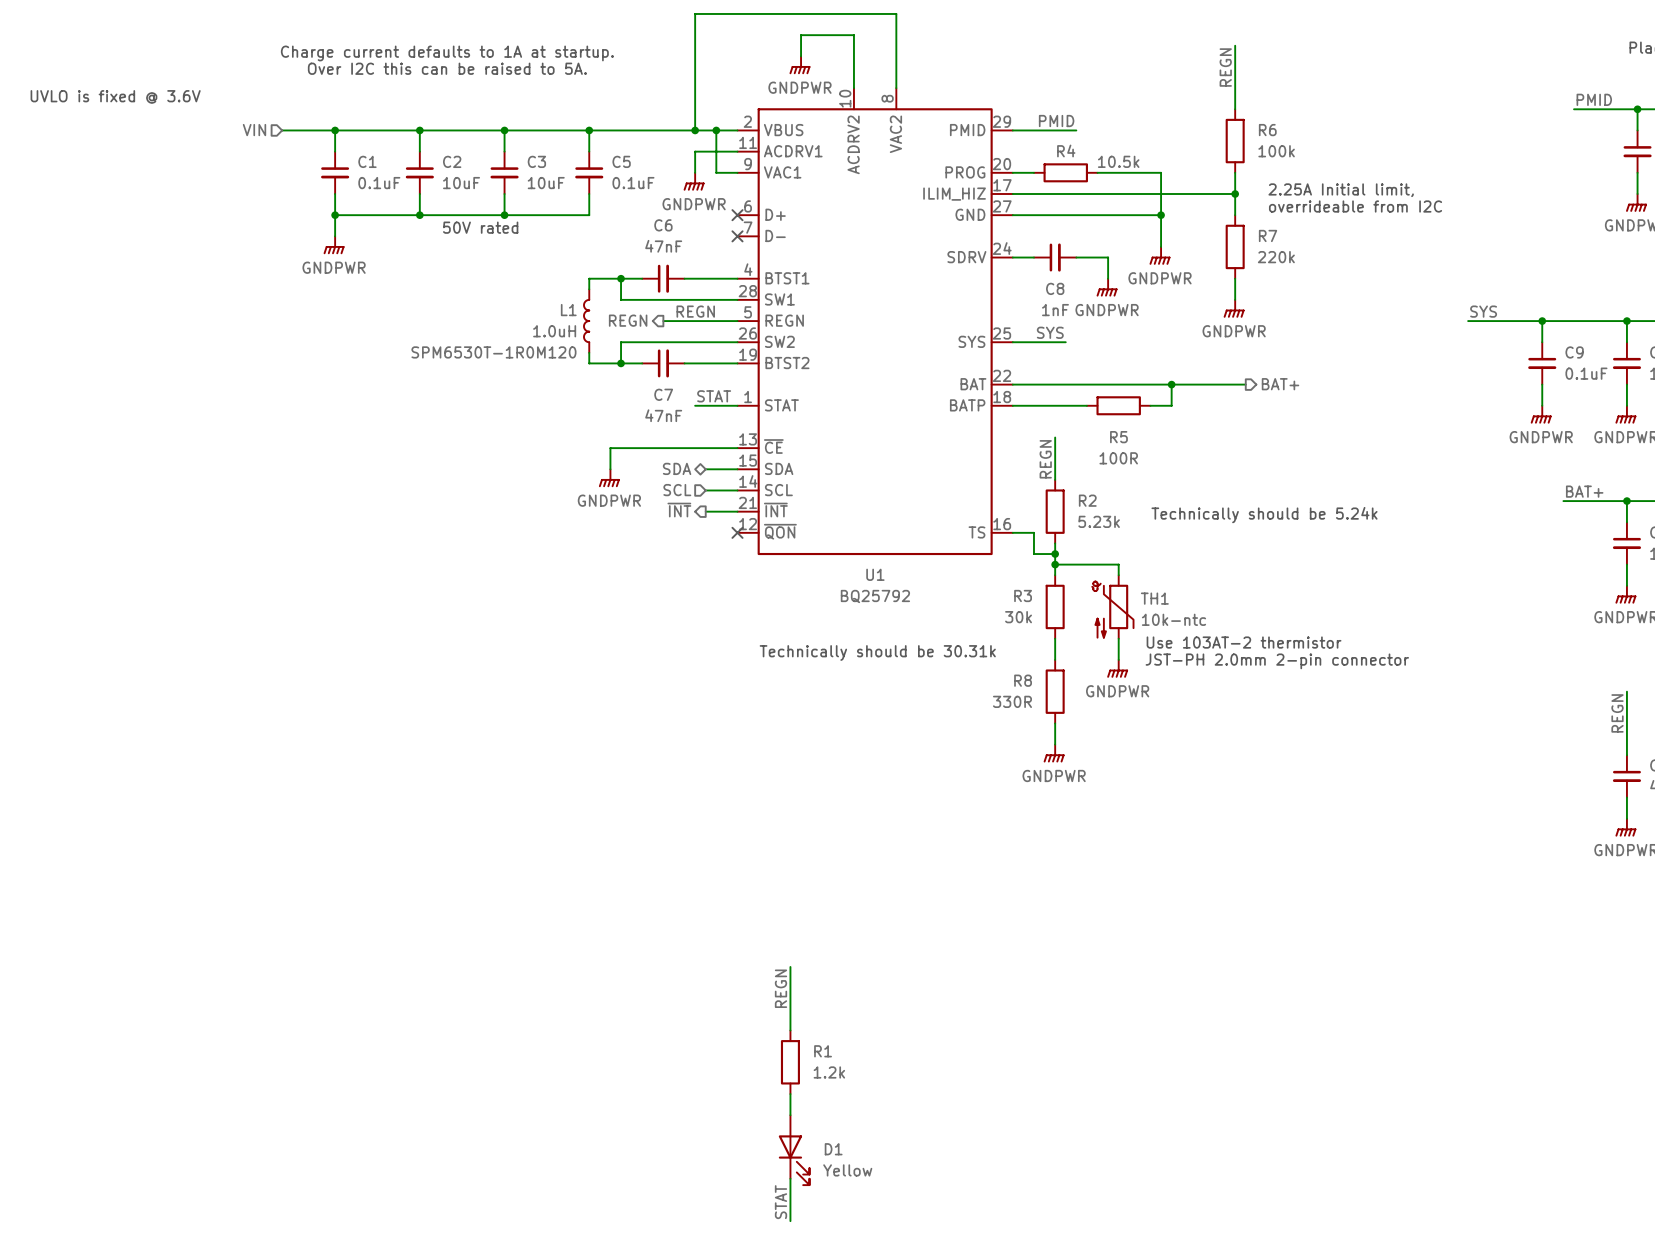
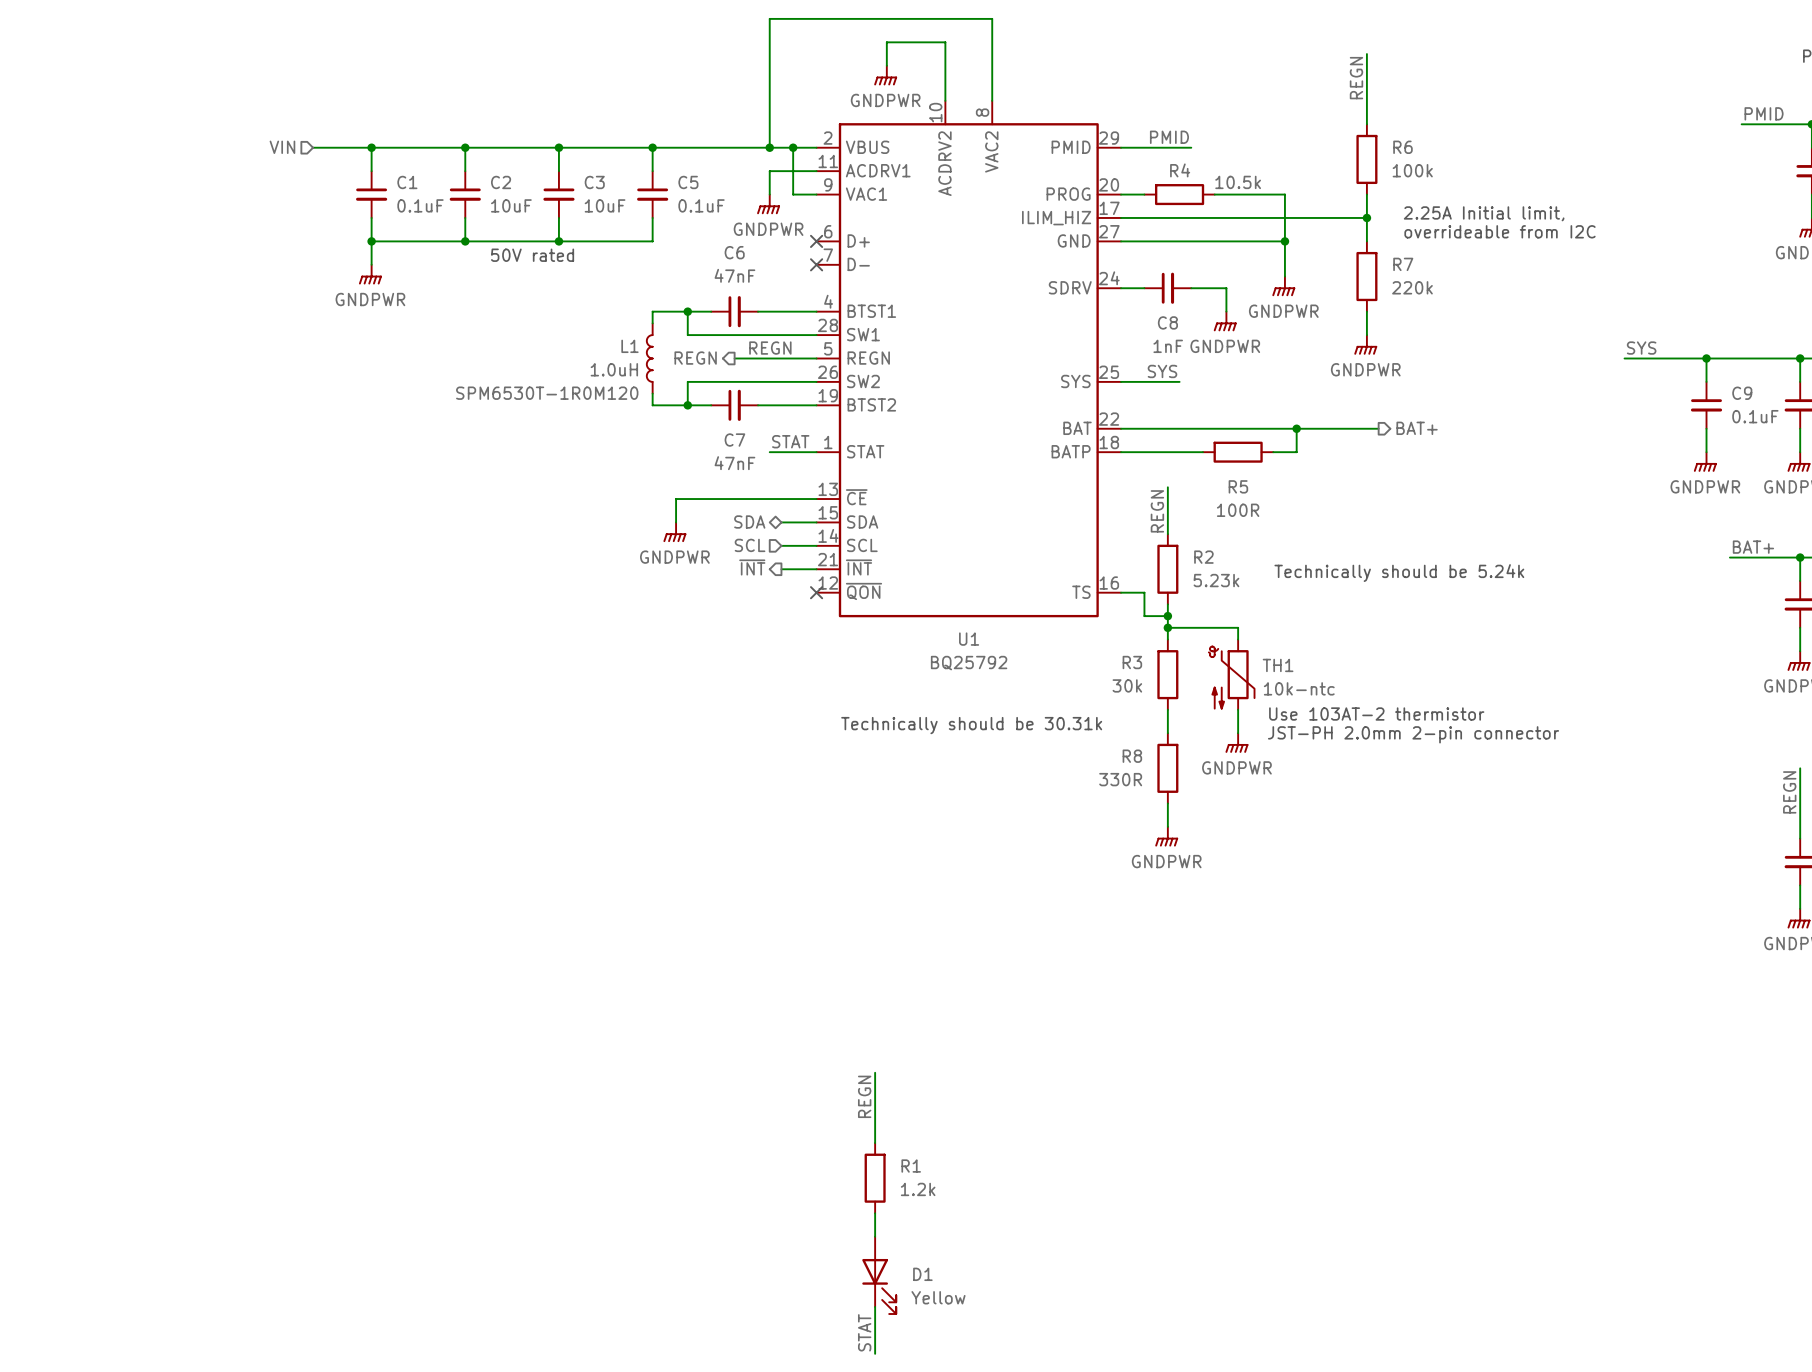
text: Charge current defaults to 1A at startup. (447, 53) -> none
text: Over I2C this can be raised to 5A. (447, 68) -> none
text: UVLO is fixed @ 3.6V (115, 96) -> none

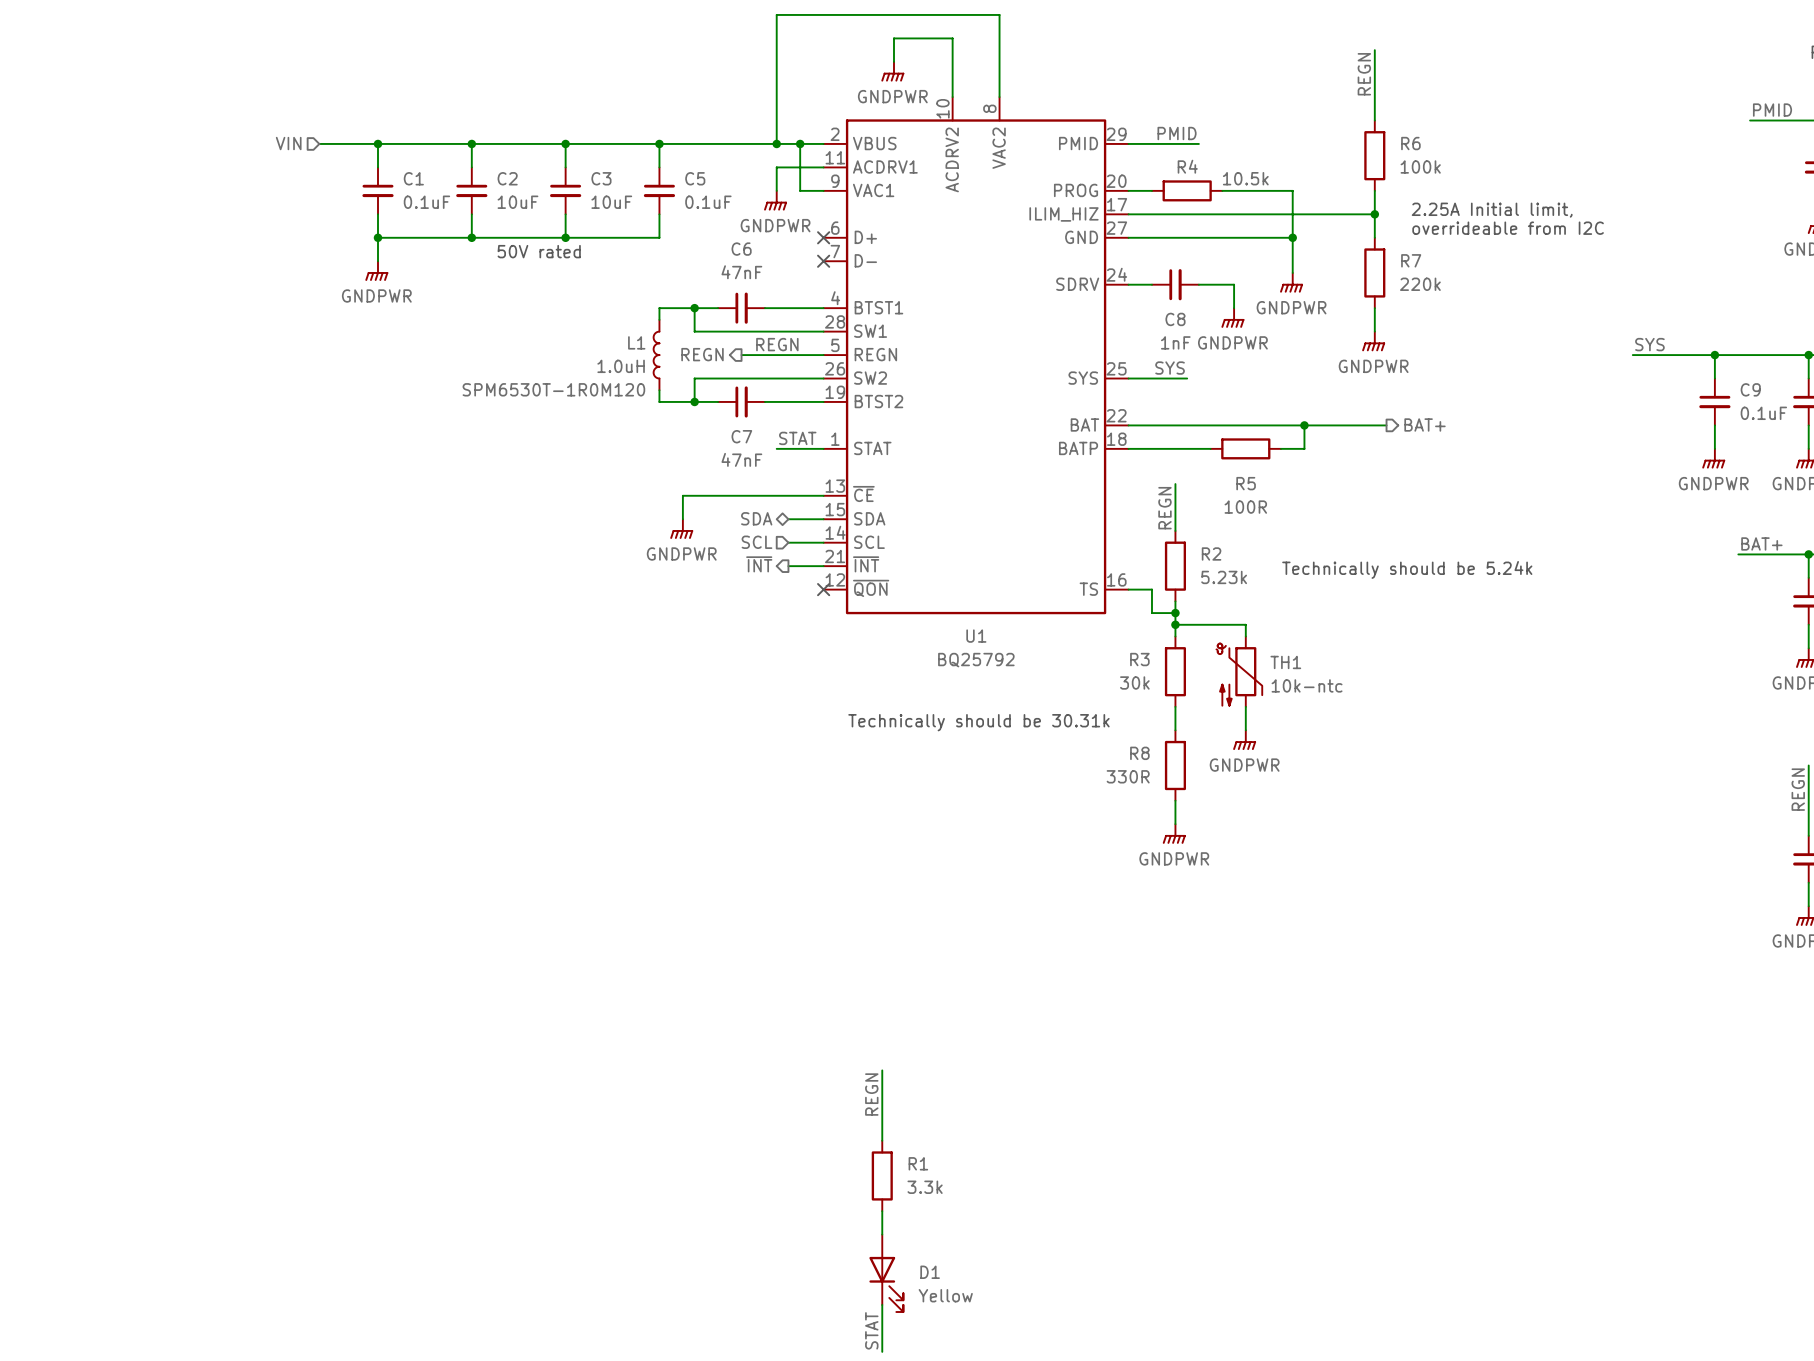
text: Use 103AT-2 thermistor (1376, 714) -> none
text: JST-PH 2.0mm 2-pin connector (1413, 734) -> none
R1 value: 1.2k (918, 1189) -> 3.3k (925, 1187)

